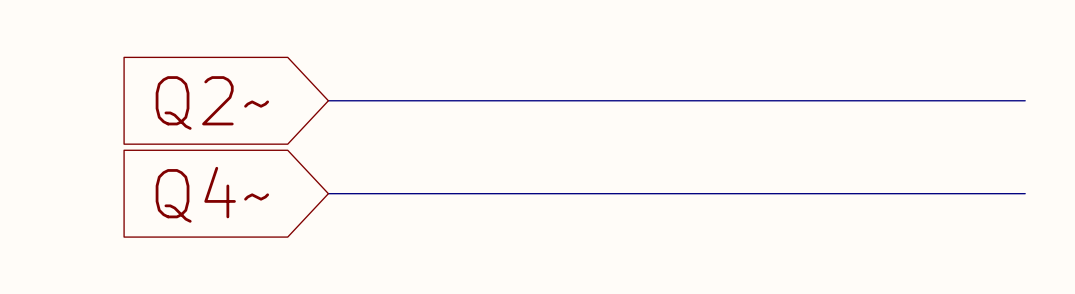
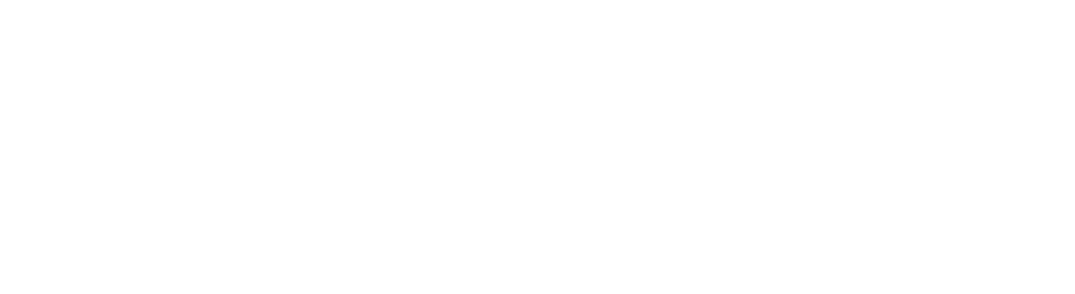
wire: (328, 100) (1025, 100) -> none
global label: Q2~ (212, 102) -> none
wire: (328, 193) (1025, 193) -> none
global label: Q4~ (212, 194) -> none

